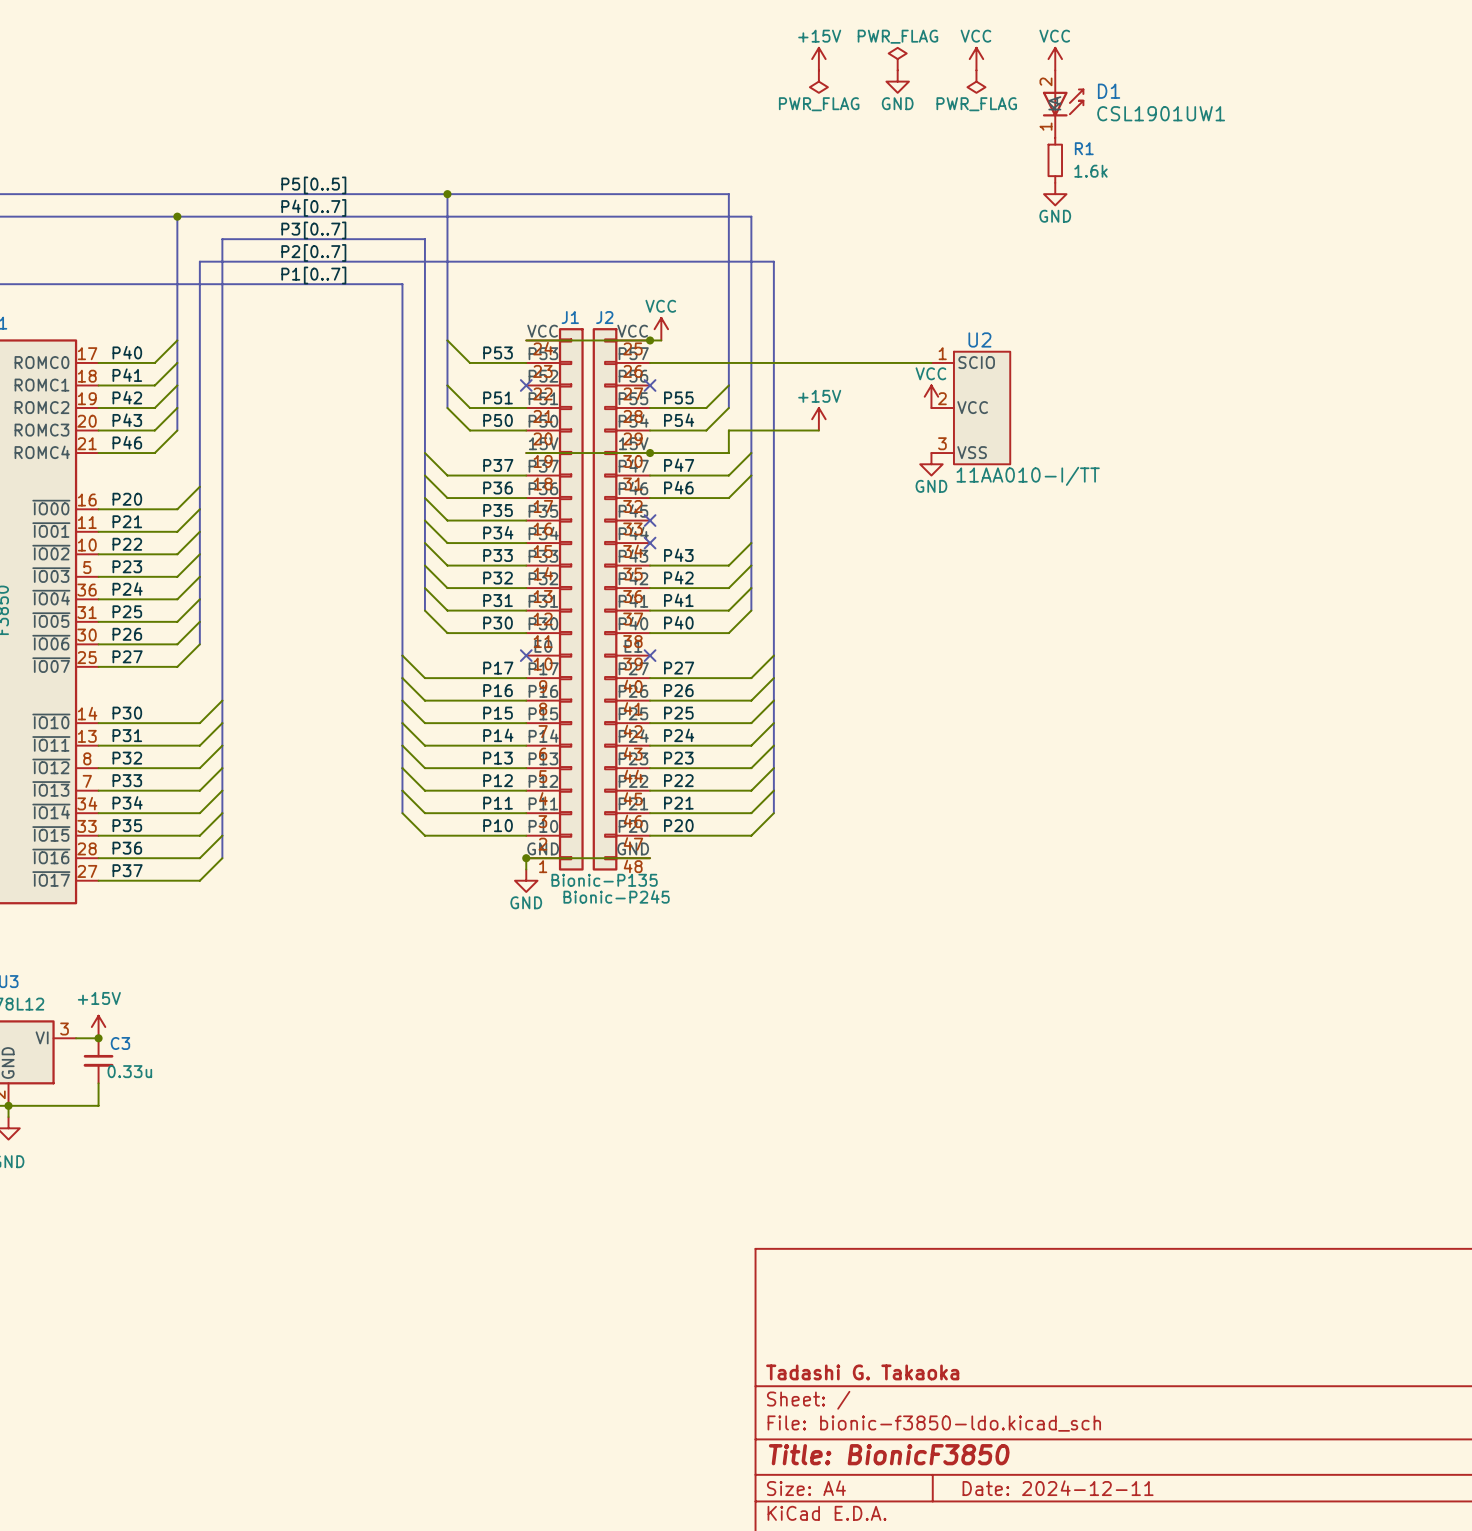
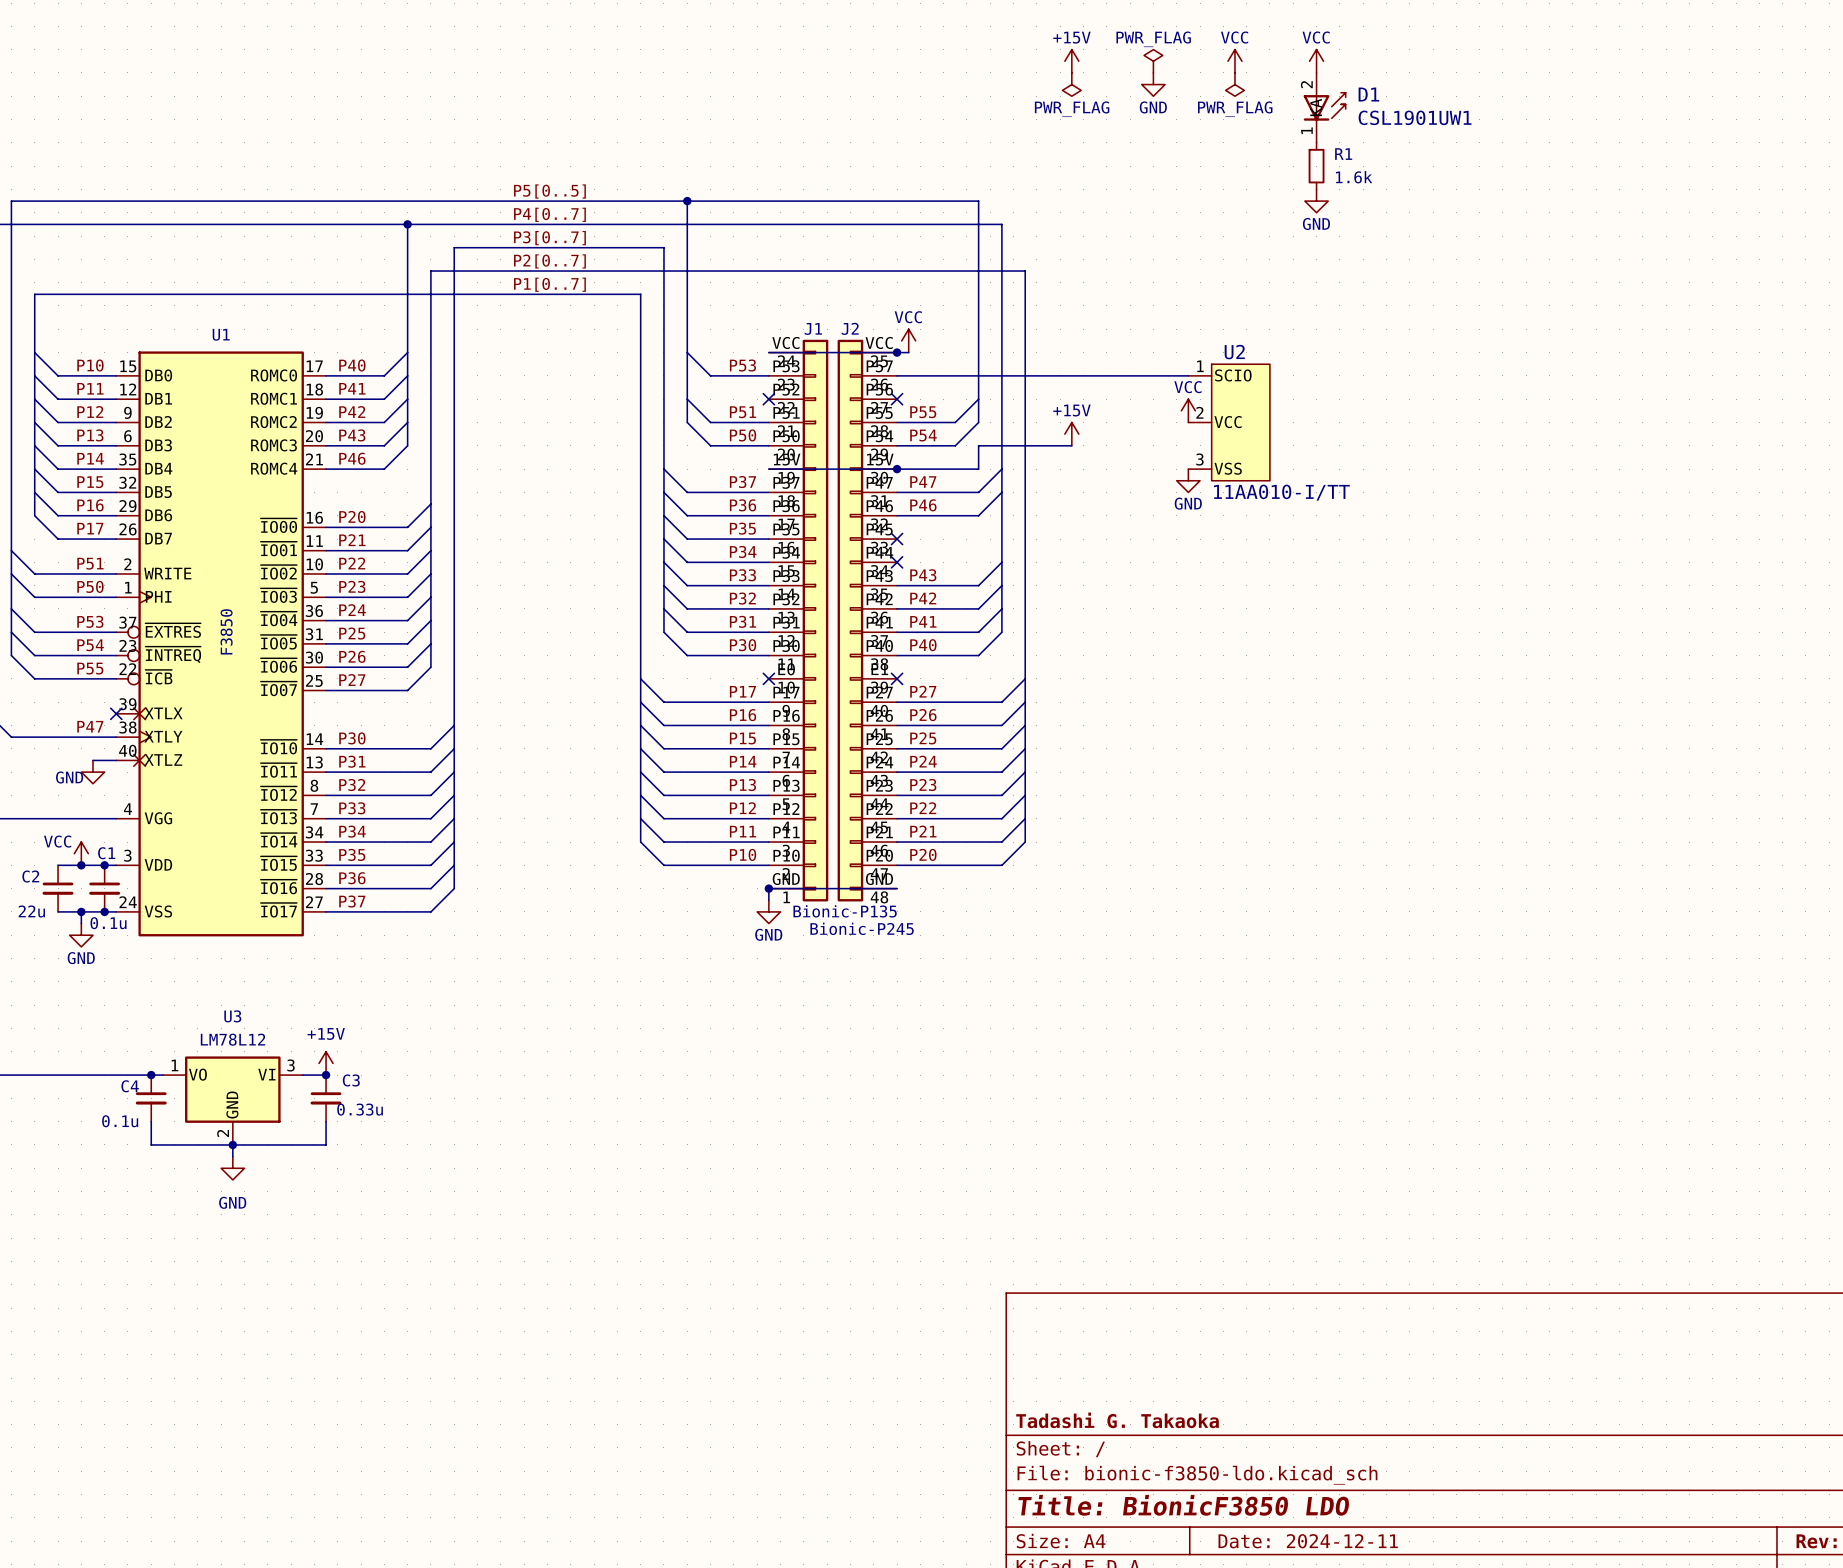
title block: Title: BionicF3850 (889, 1454) -> Title: BionicF3850 LDO (1183, 1505)

